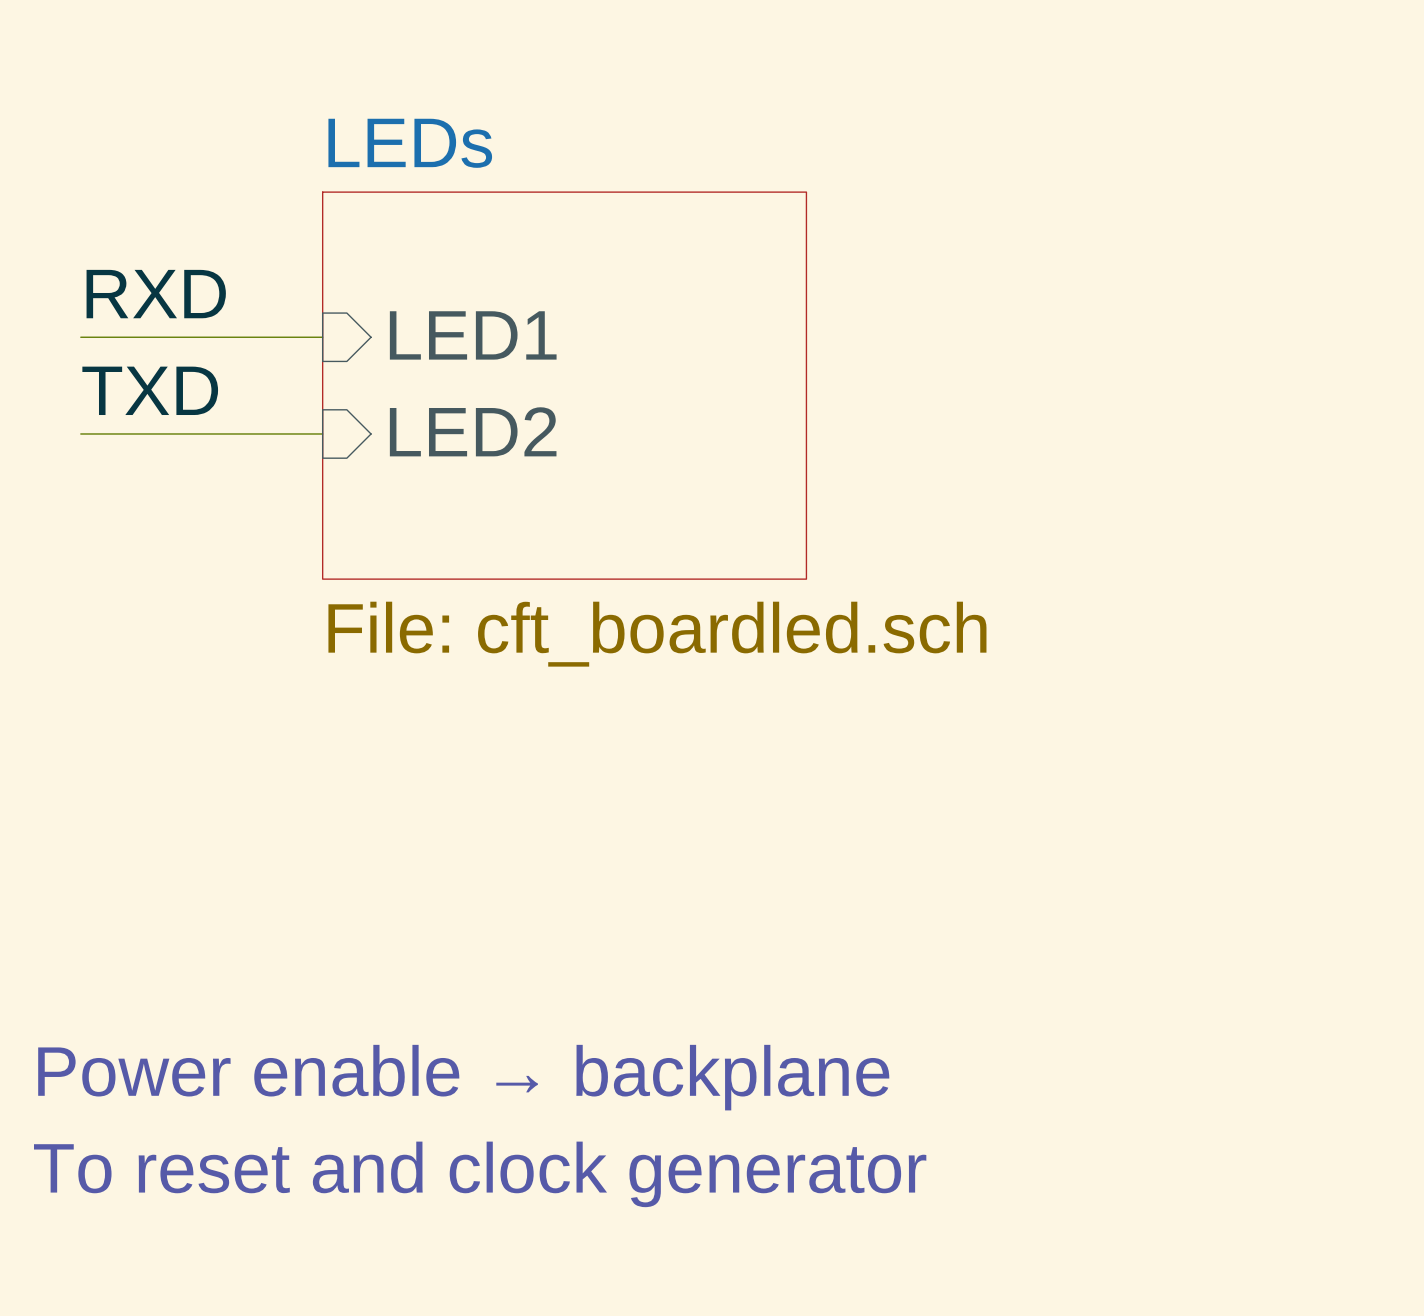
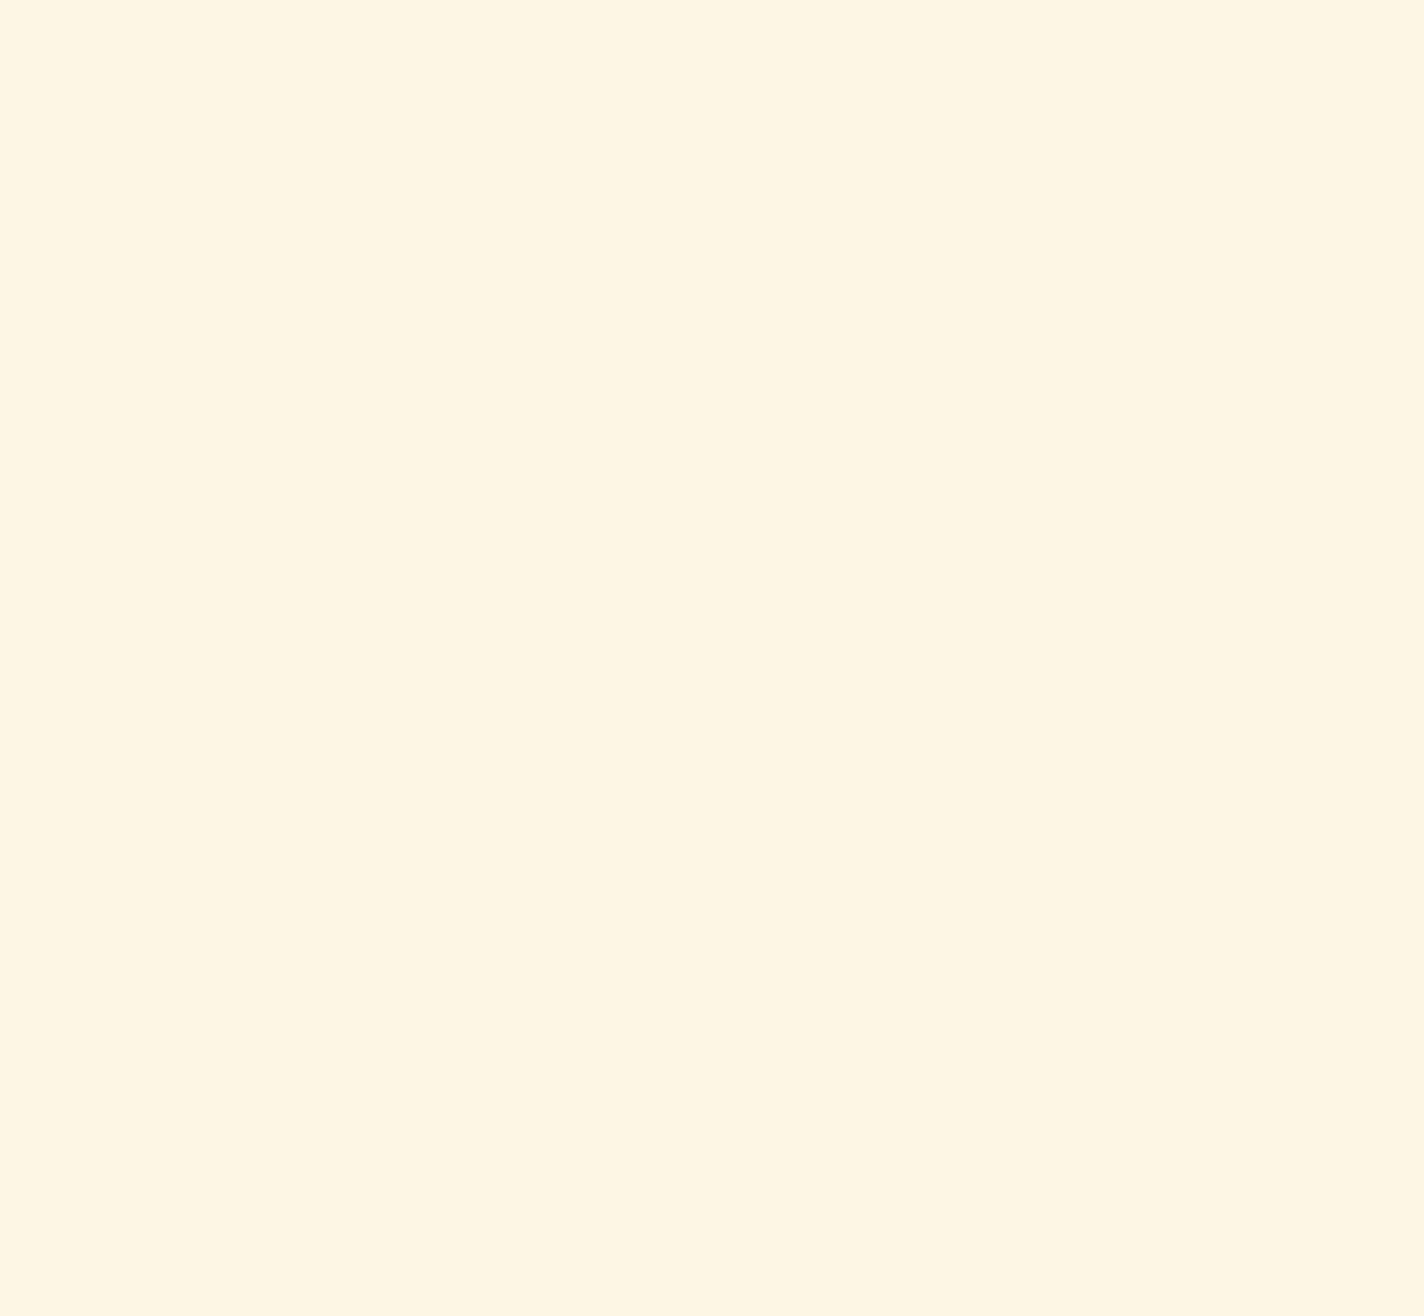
label: RXD (156, 294) -> none
sheet pin: LED1 (473, 335) -> none
wire: (80, 337) (322, 337) -> none
sheet LEDs: File: cft_boardled.sch (564, 385) -> none
label: TXD (150, 390) -> none
sheet pin: LED2 (473, 431) -> none
wire: (80, 433) (322, 433) -> none
text: Power enable → backplane (463, 1077) -> none
text: To reset and clock generator (480, 1174) -> none

